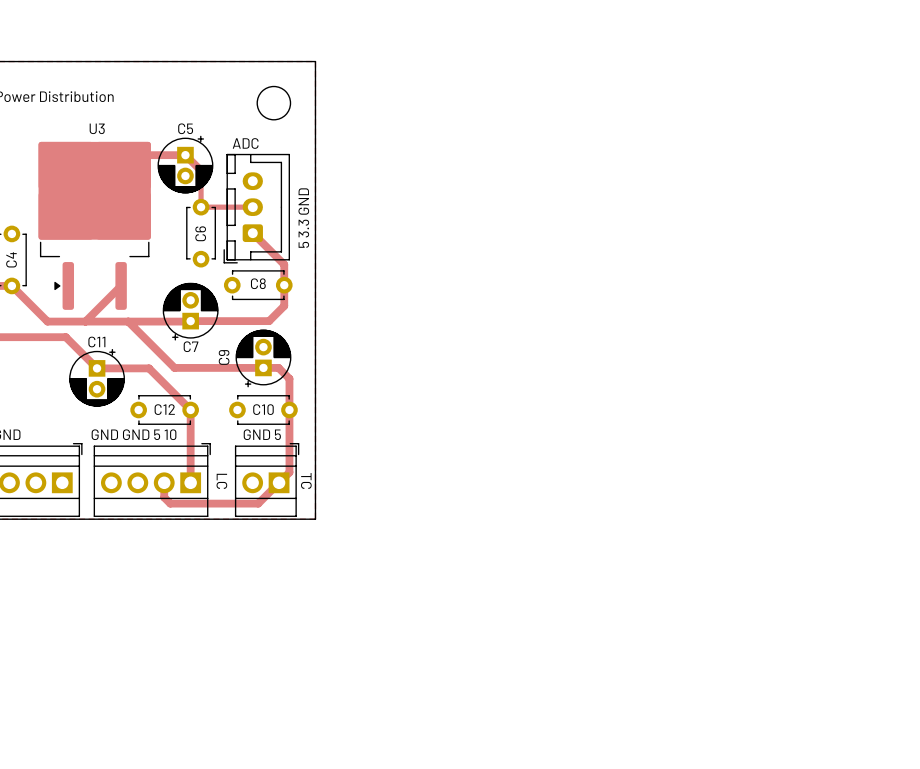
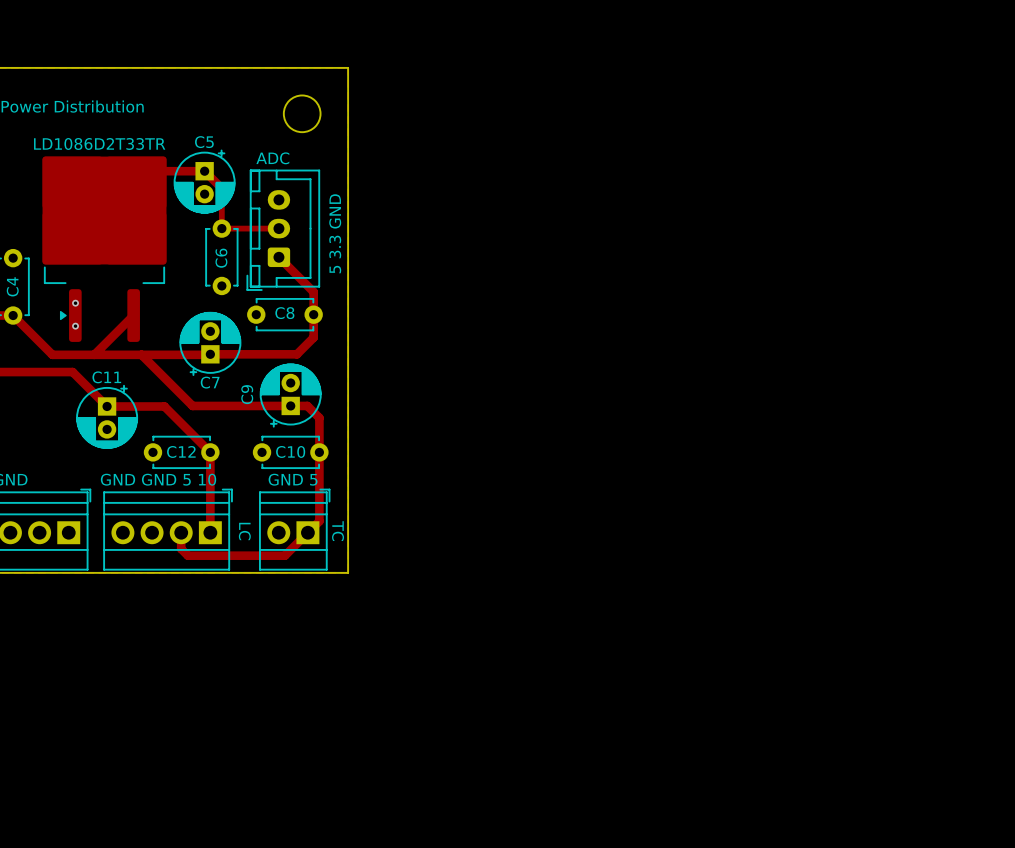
U3 name: U3 (97, 128) -> none
text: none -> LD1086D2T33TR (99, 143)
via: none -> (75, 303)
via: none -> (75, 326)

